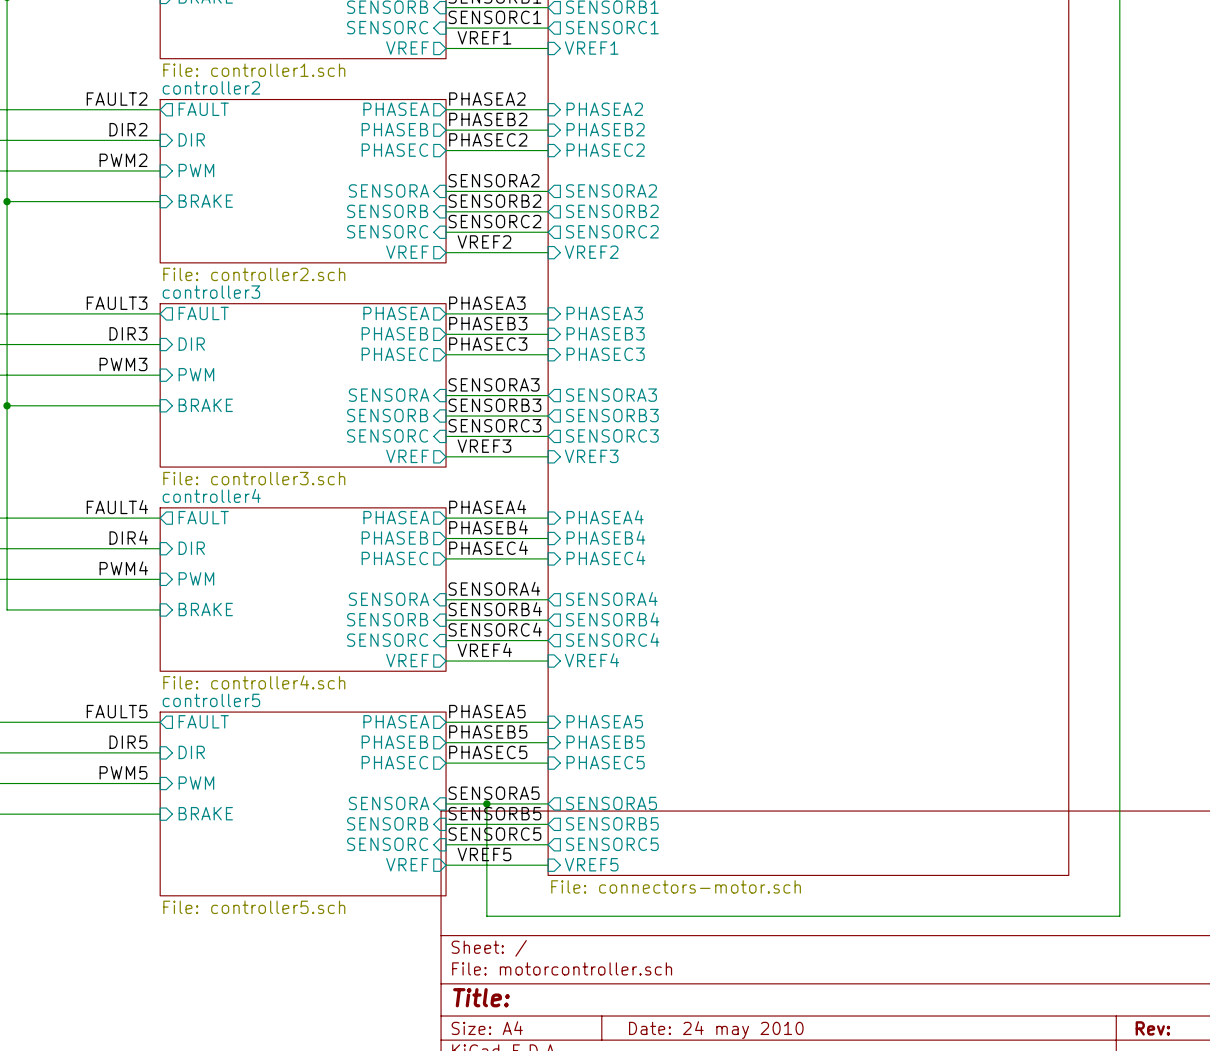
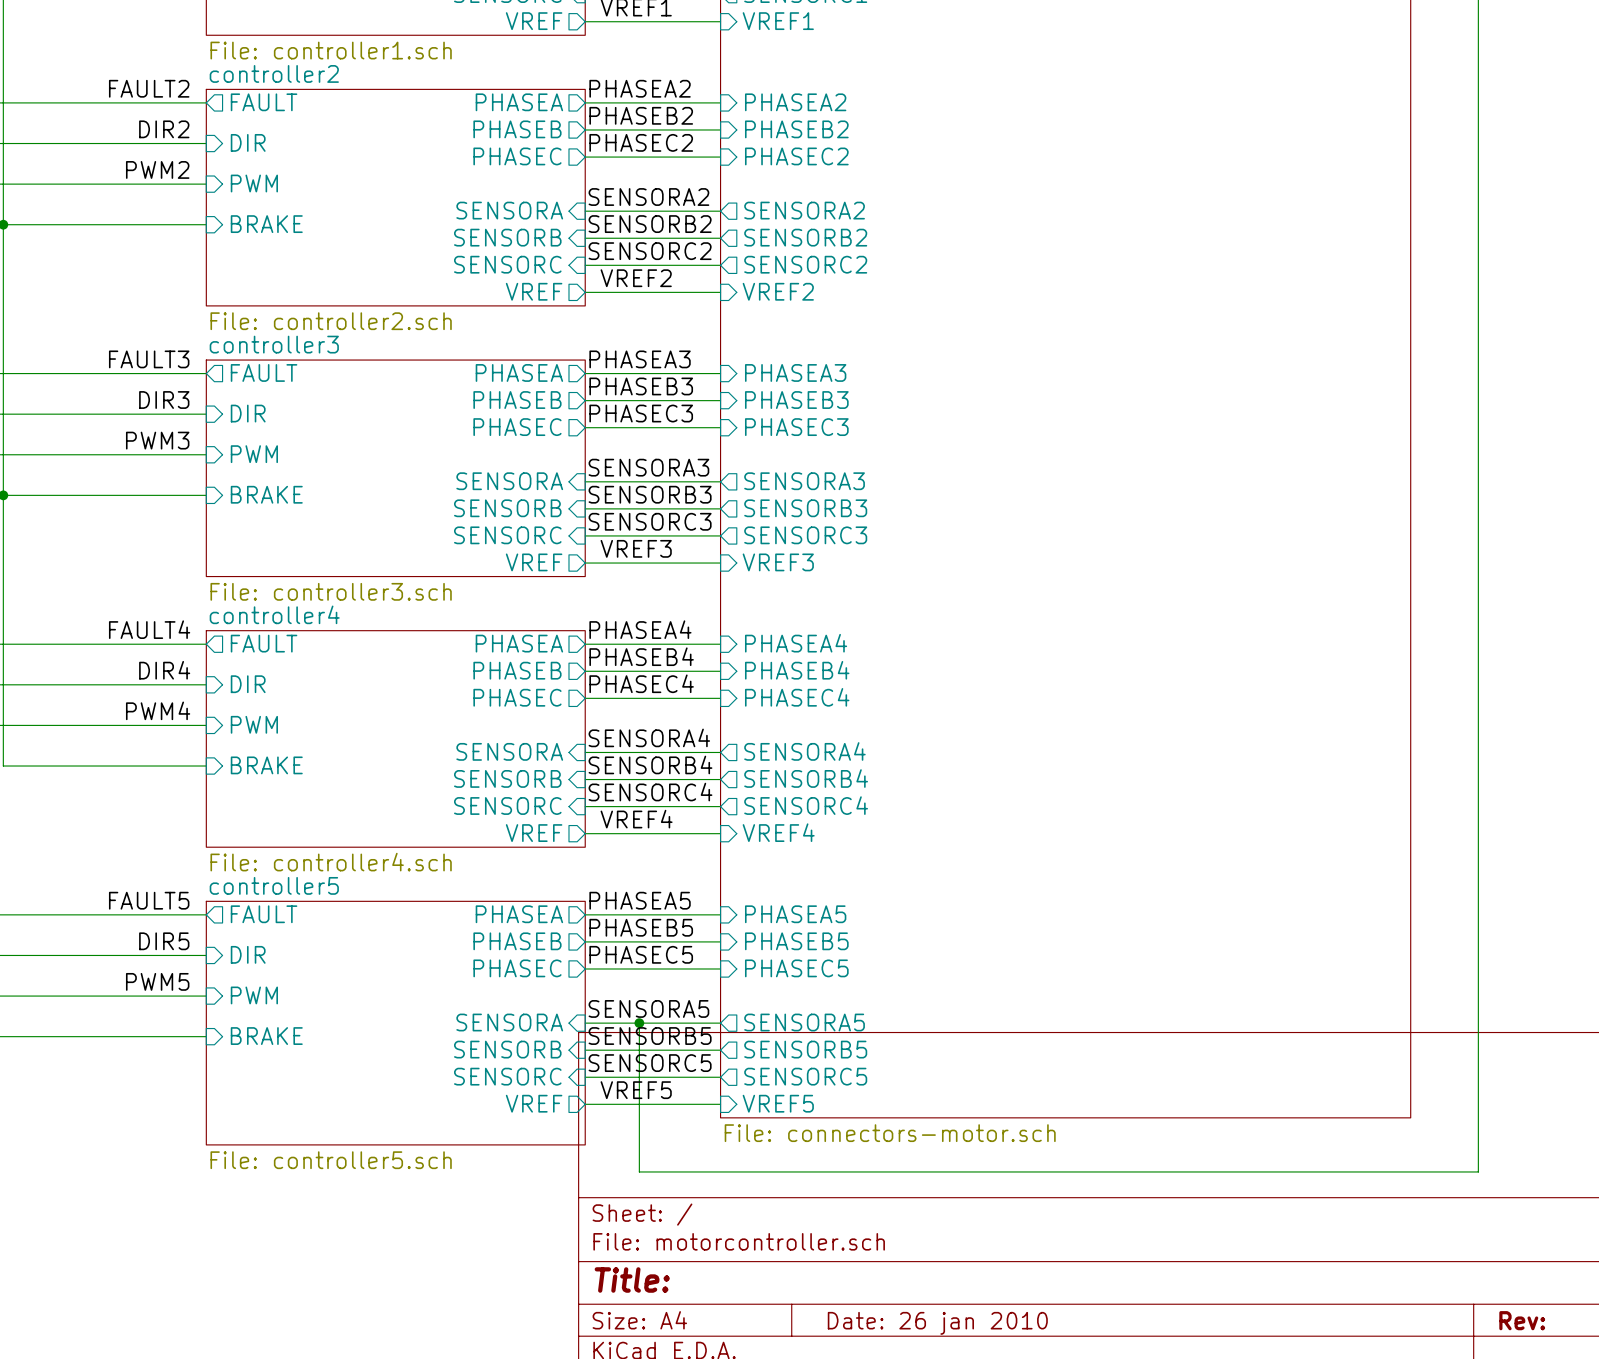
title block: Date: 24 may 2010 (716, 1030) -> Date: 26 jan 2010 (937, 1323)

